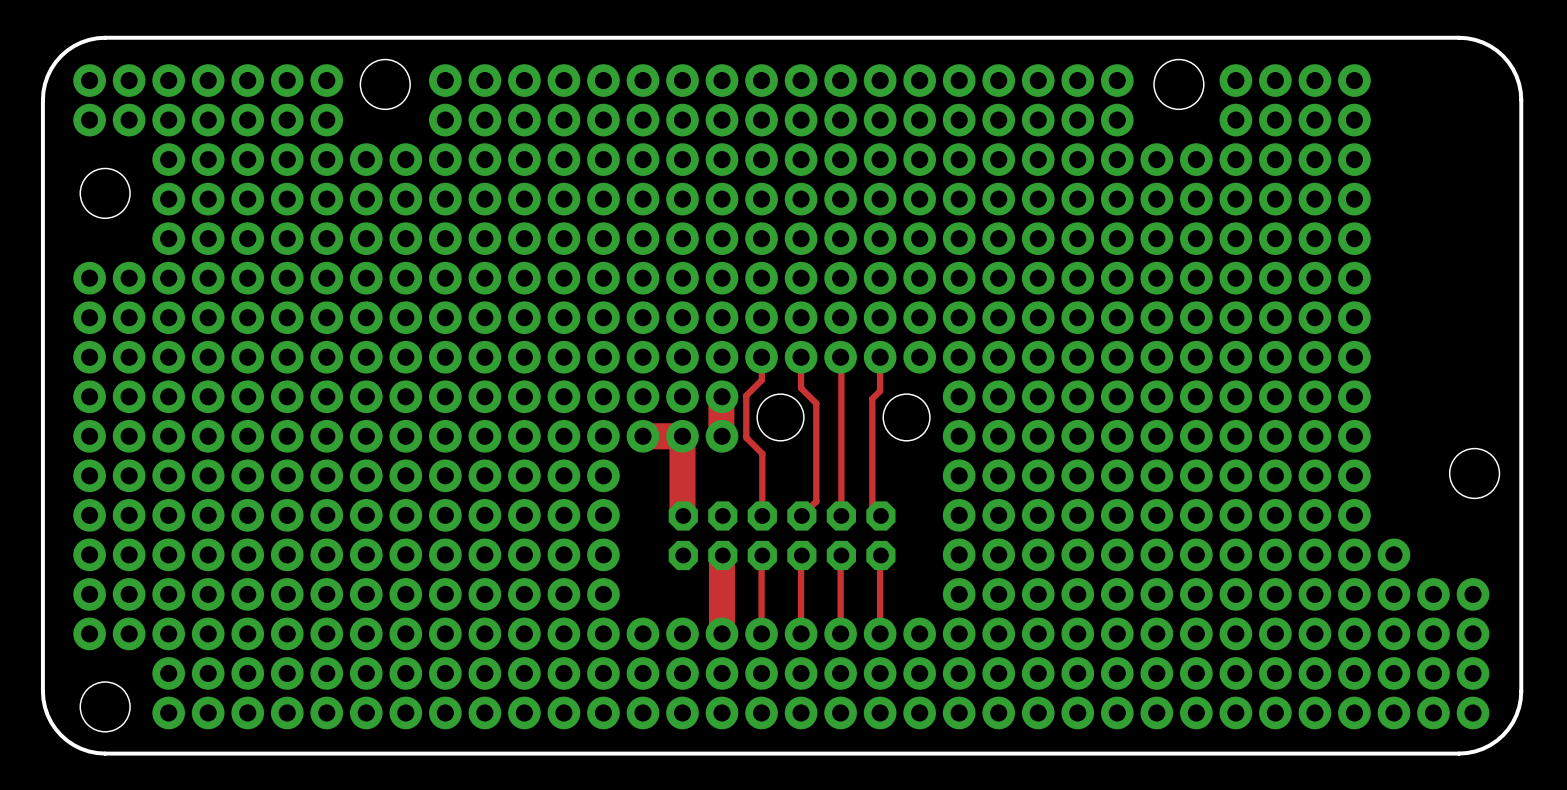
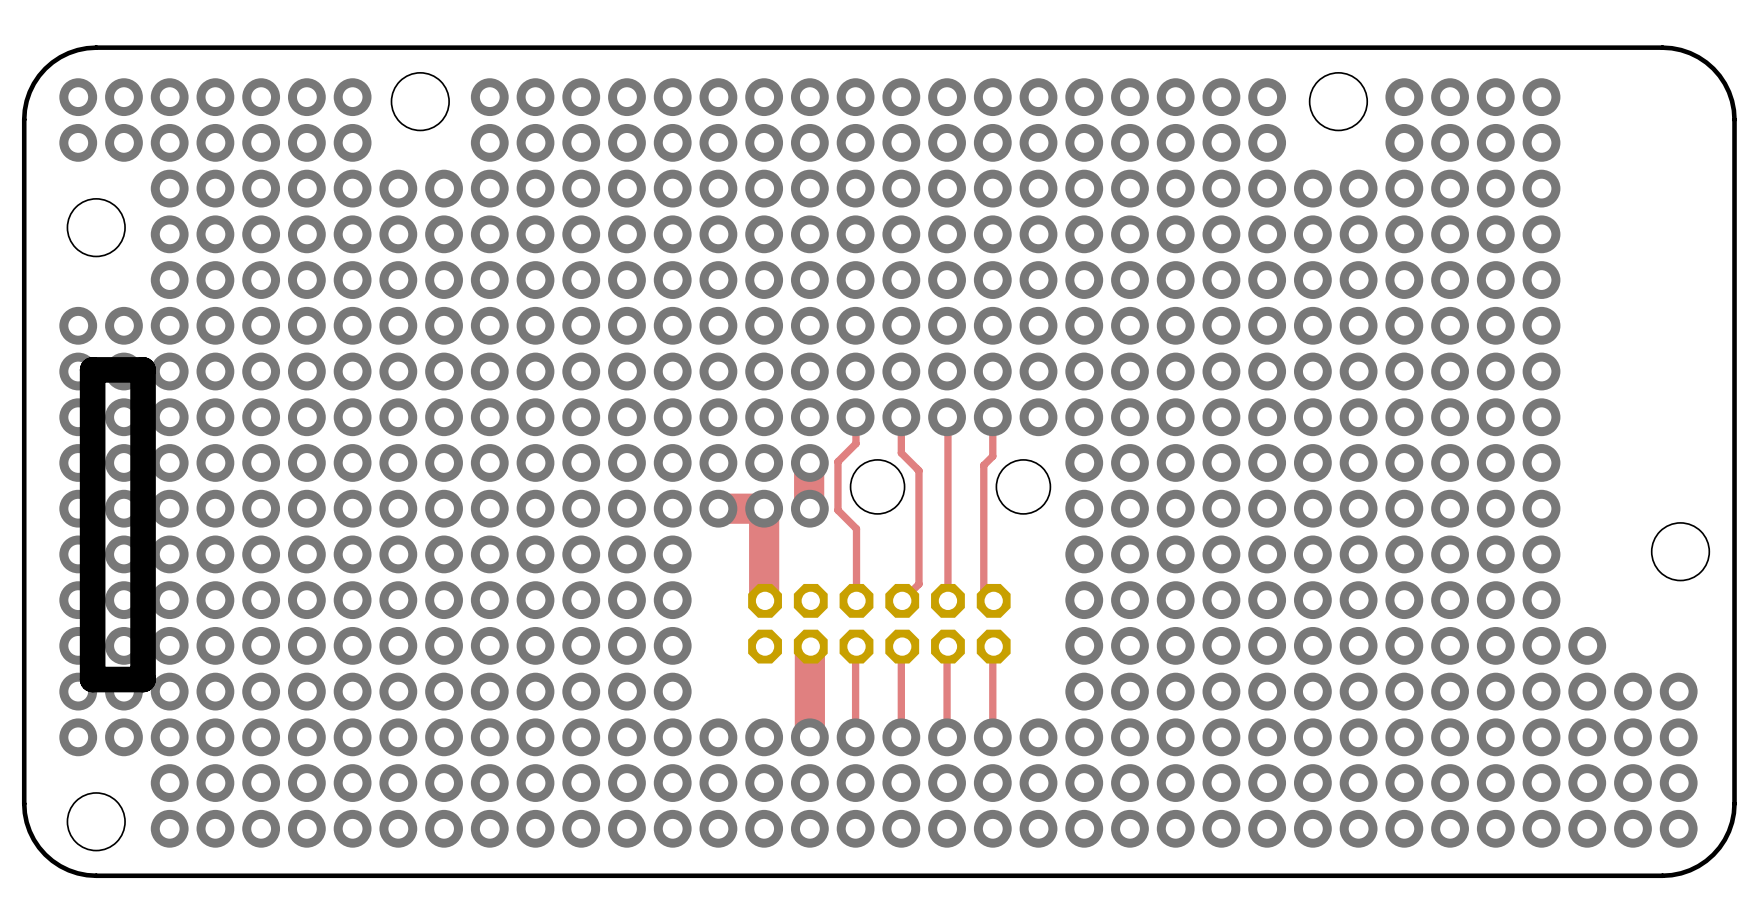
board edge: none -> (143, 369) (143, 679) (92, 679) (92, 369) (143, 369)

